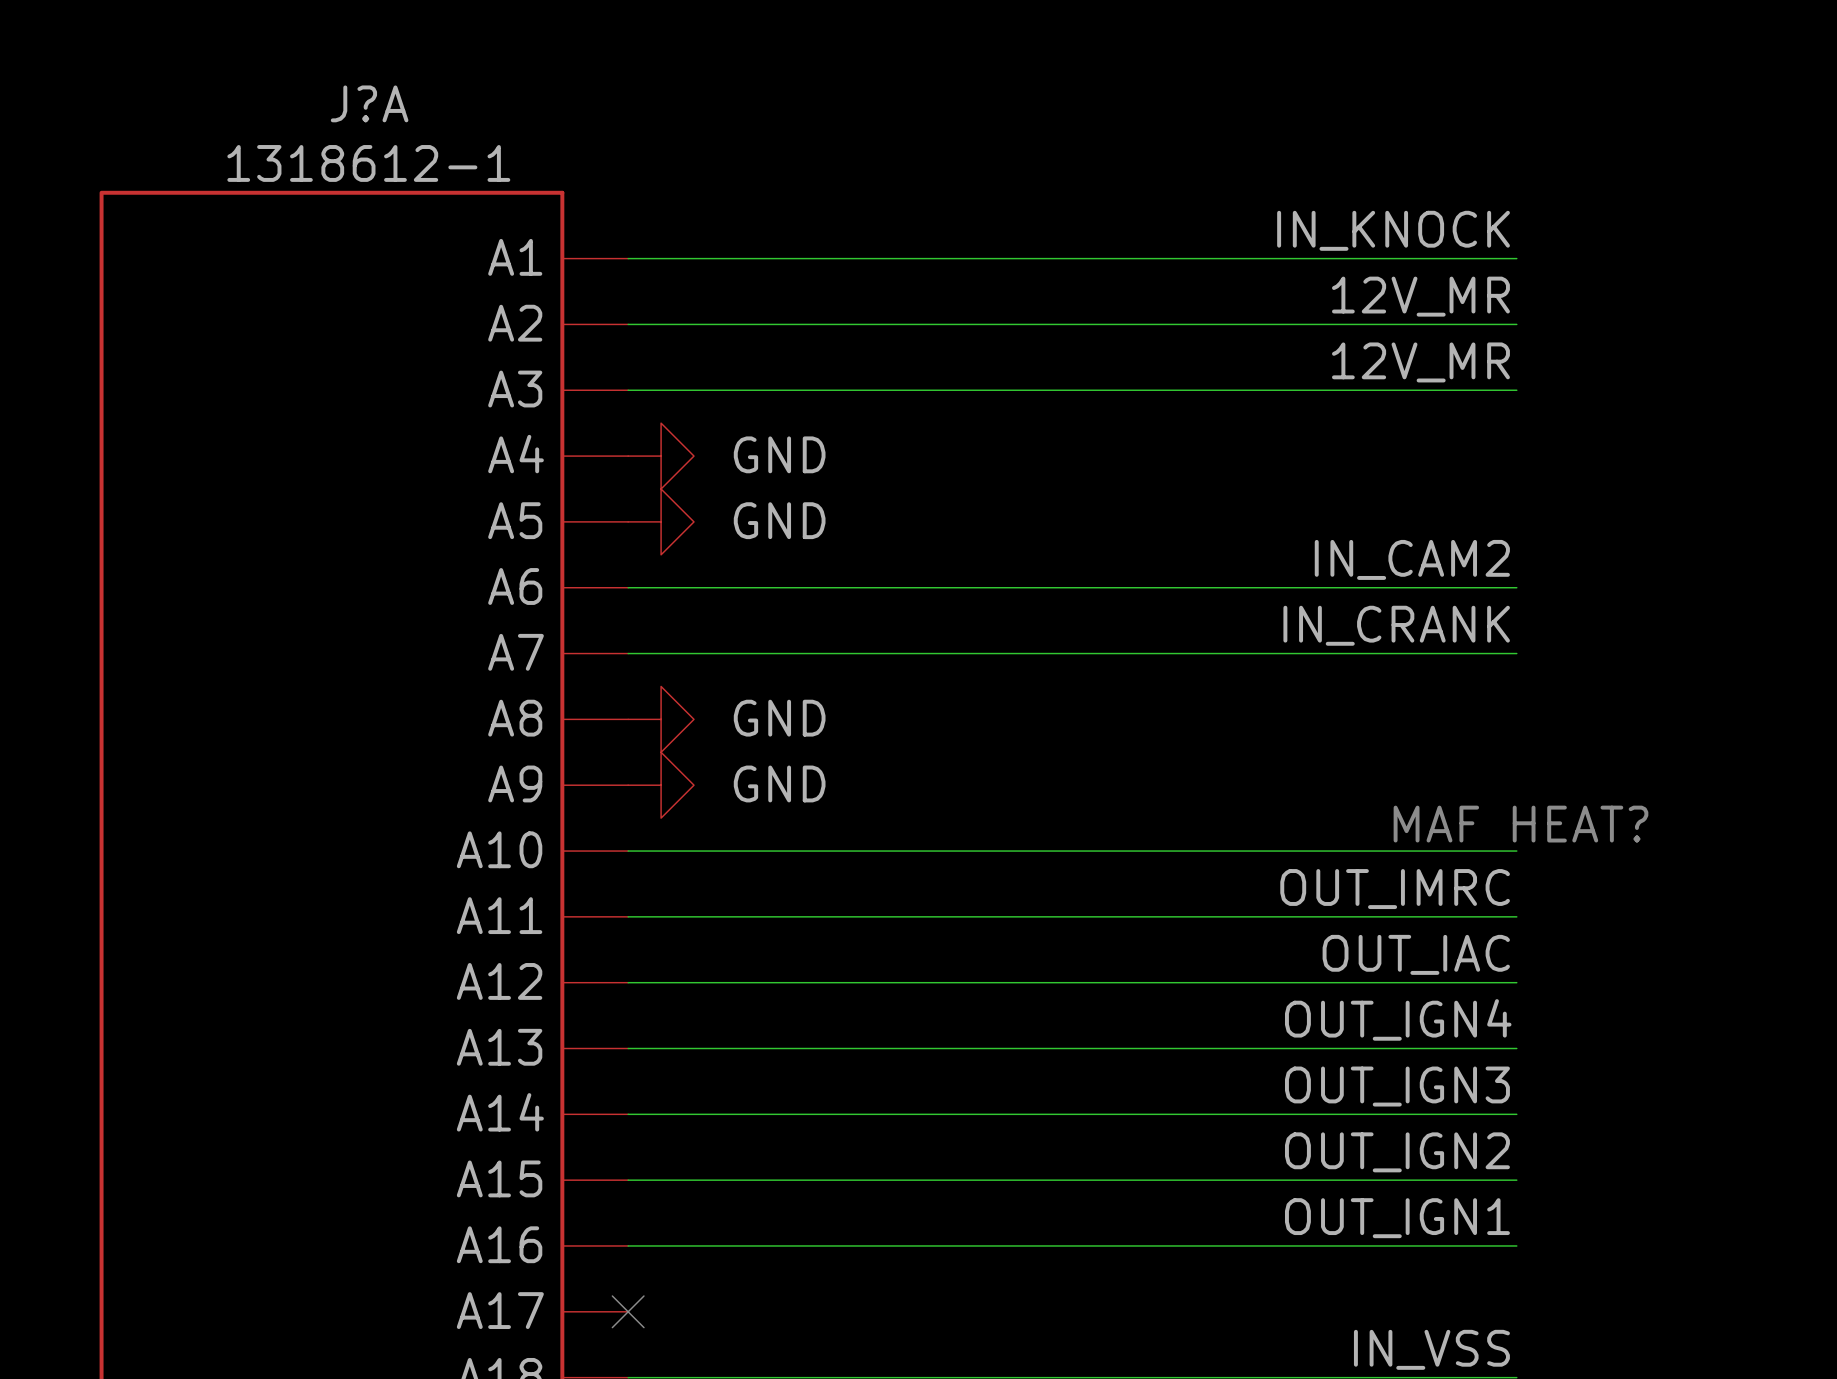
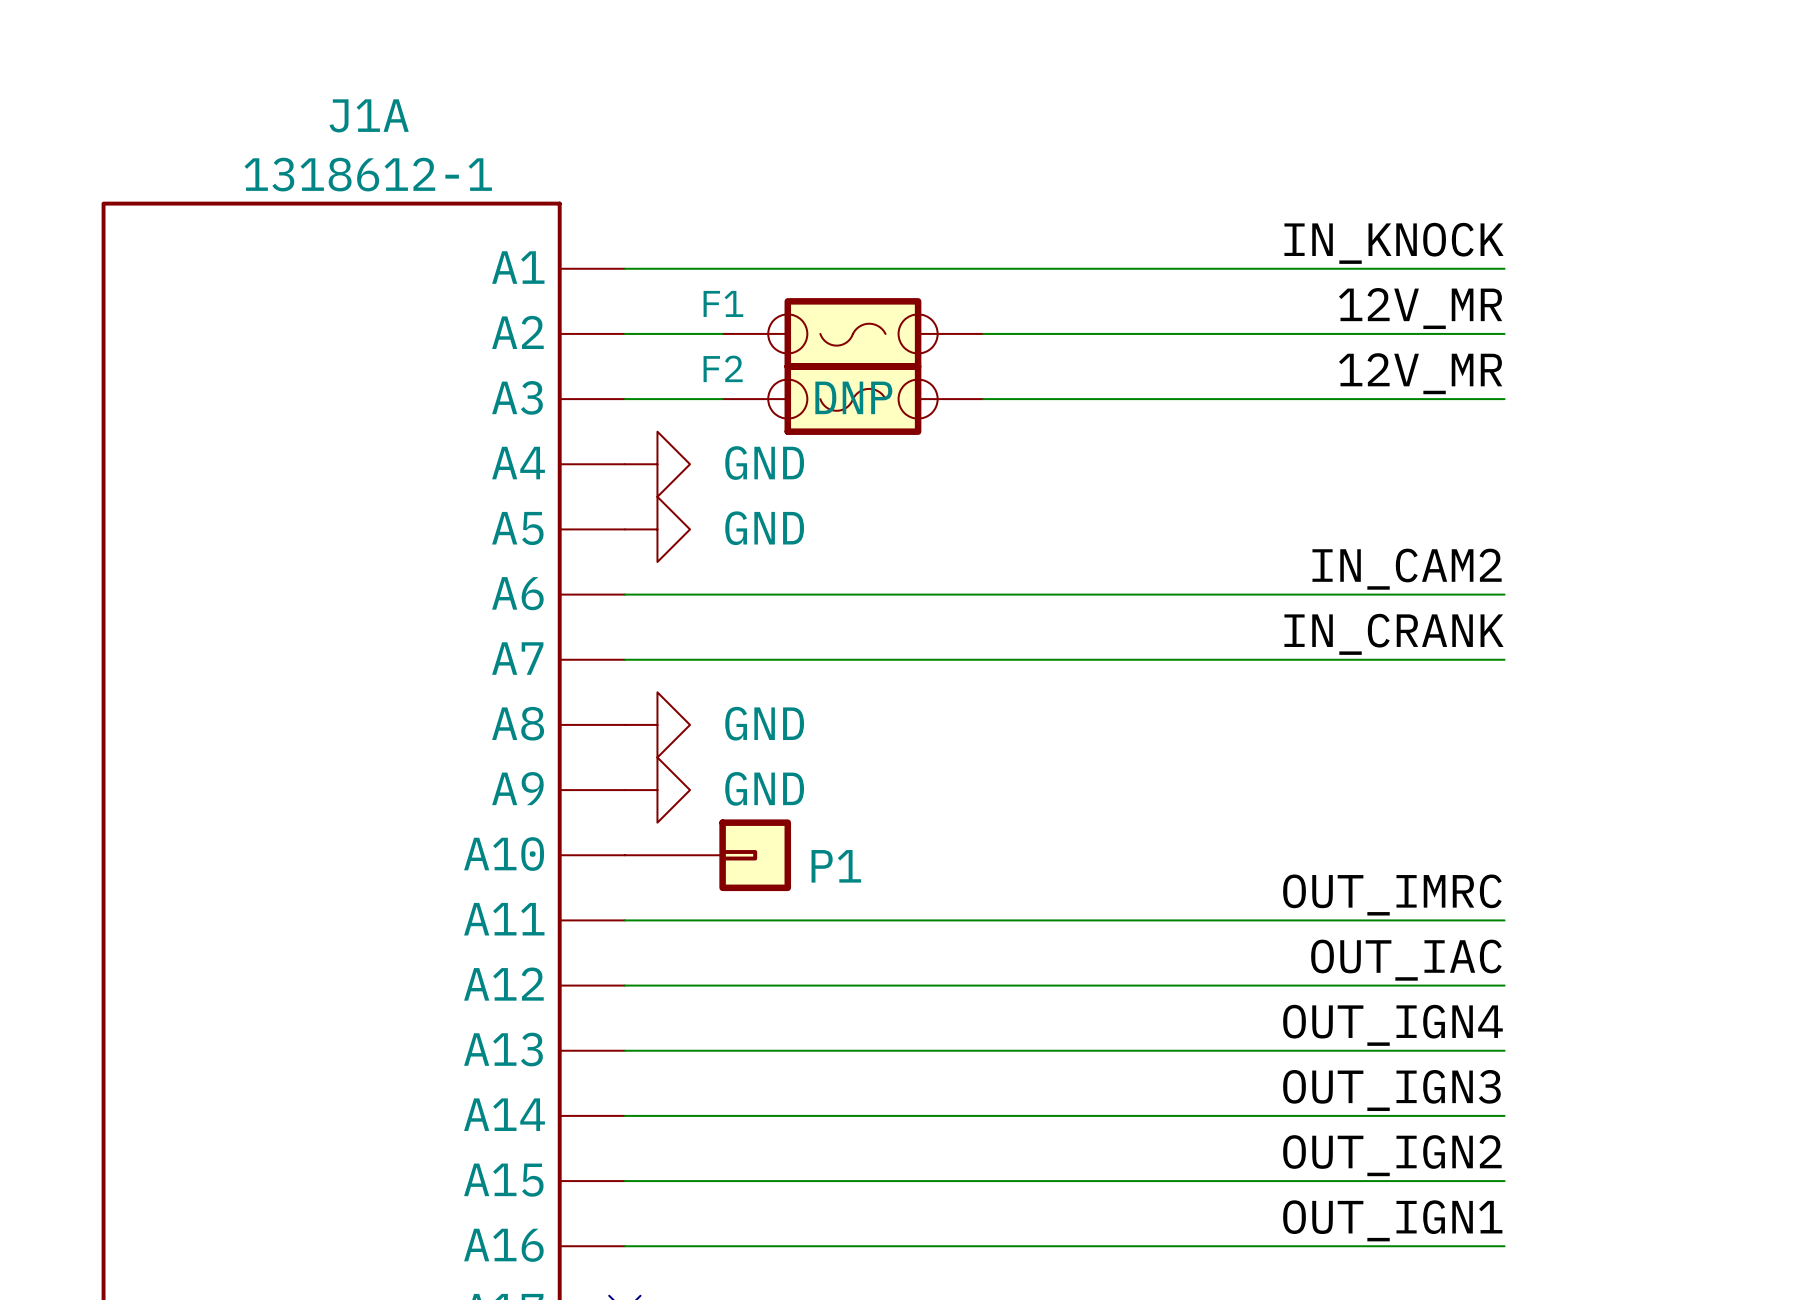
J?A name: J?A (369, 103) -> J1A (369, 115)
F1: none -> (852, 333)
F2: none -> (852, 399)
text: MAF HEAT? (1520, 824) -> none
wire: (628, 851) (1516, 851) -> none
P1: none -> (707, 855)

